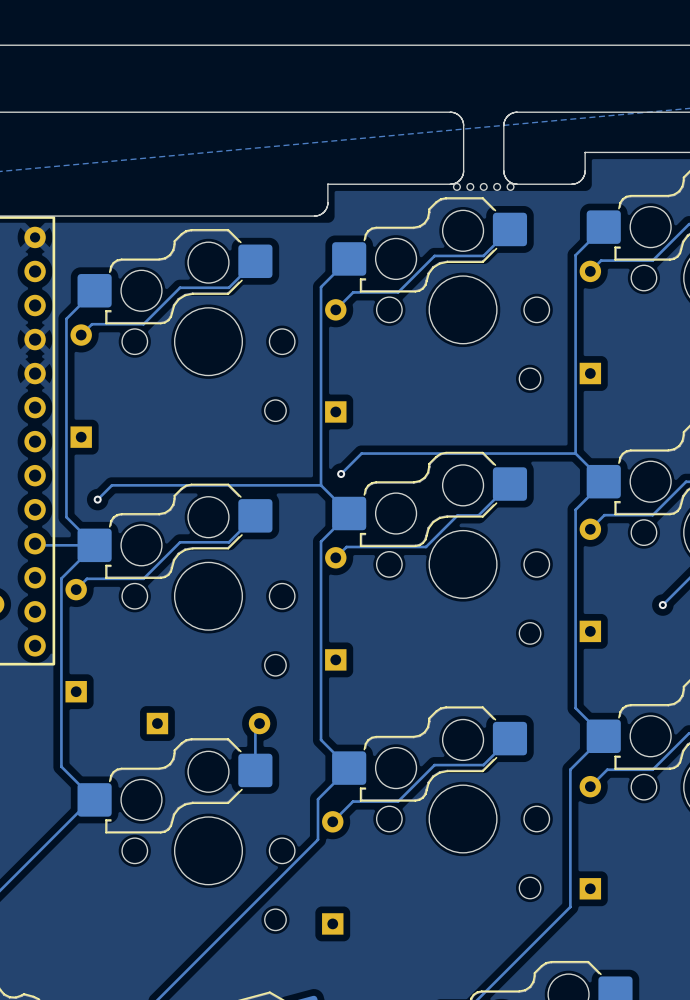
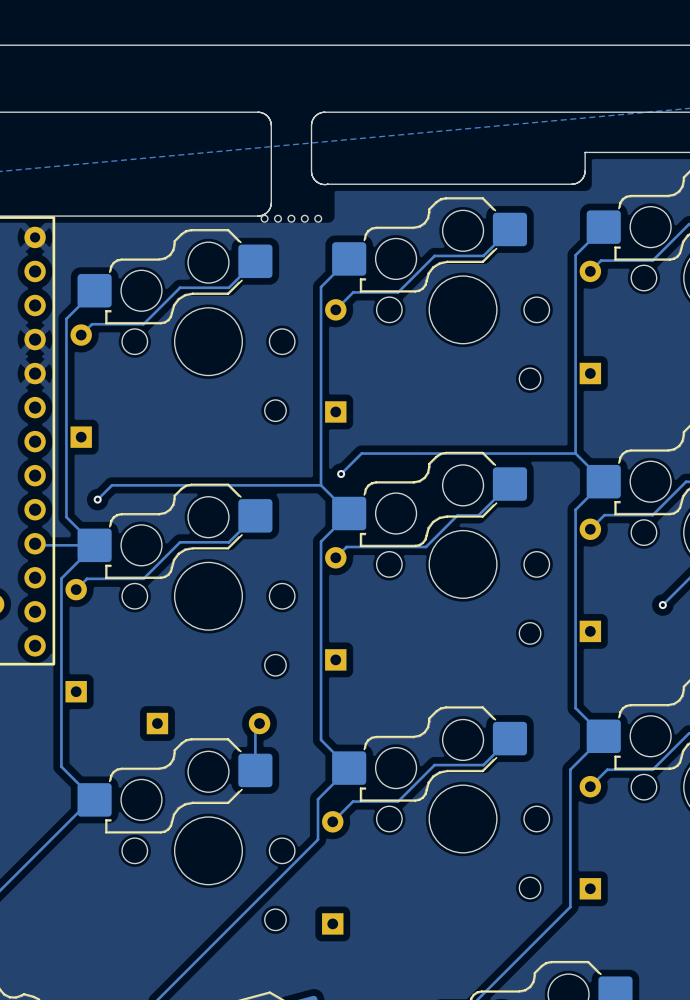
board edge: (324, 112) (257, 112) -> (324, 112) (316, 115) (311, 122) (311, 171) (316, 181) (327, 184)
board edge: (450, 112) (459, 116) (463, 125) (463, 174) (458, 181) (450, 184) -> (517, 184) (450, 184)
board edge: (517, 112) (507, 116) (503, 125) (504, 174) (508, 181) (517, 184) -> (517, 112) (450, 112)
board edge: (327, 184) (327, 205) (320, 214) (257, 216) -> (257, 112) (267, 116) (271, 125) (271, 204) (266, 213) (257, 216)
part: (456, 186) -> none
part: (470, 186) -> none
part: (483, 186) -> none
part: (497, 186) -> none
part: (510, 186) -> none
part: none -> (264, 218)
part: none -> (278, 218)
part: none -> (291, 218)
part: none -> (304, 218)
part: none -> (318, 218)

